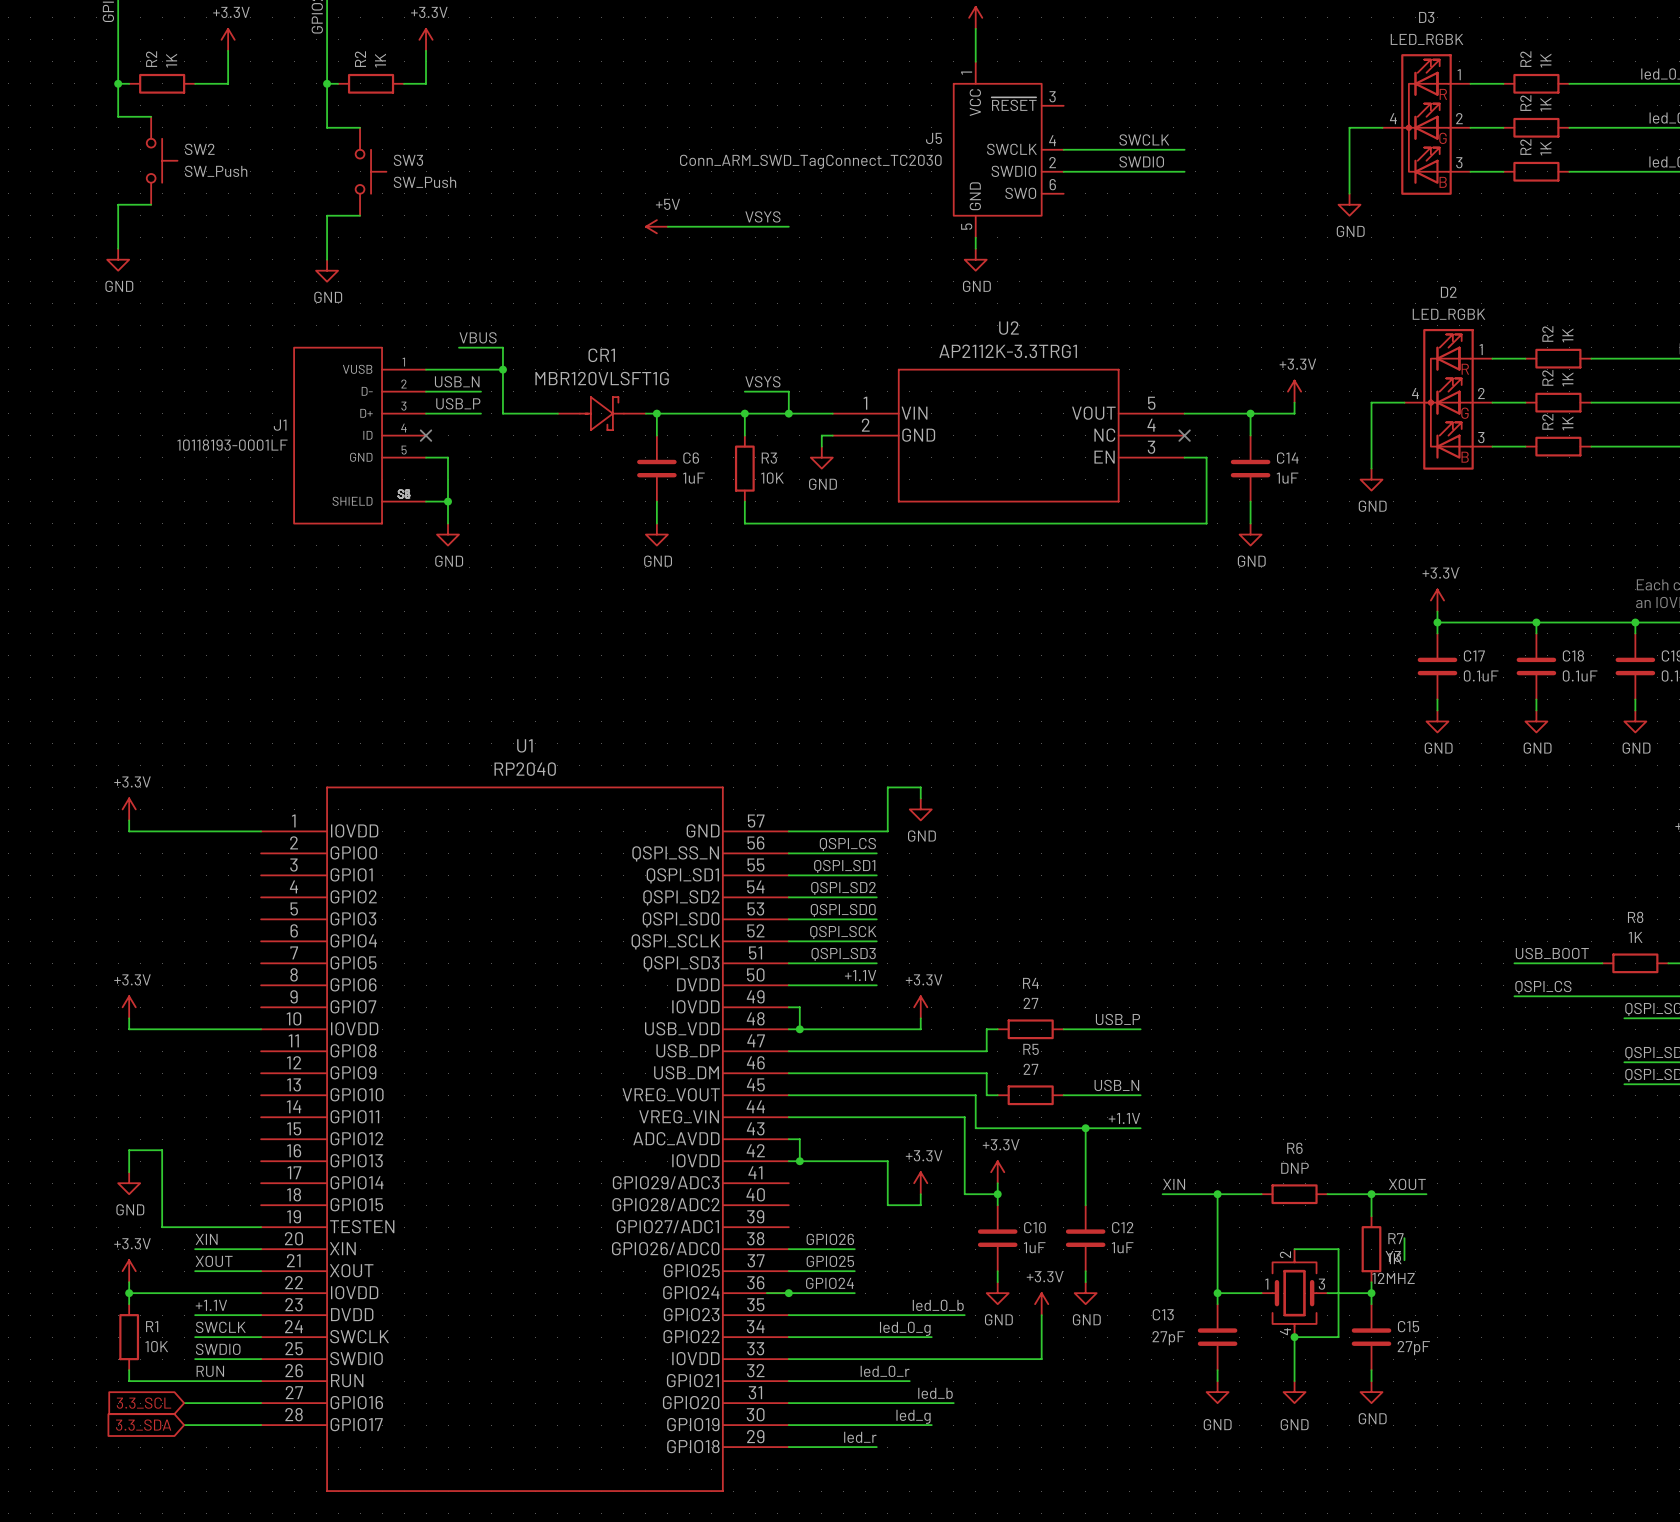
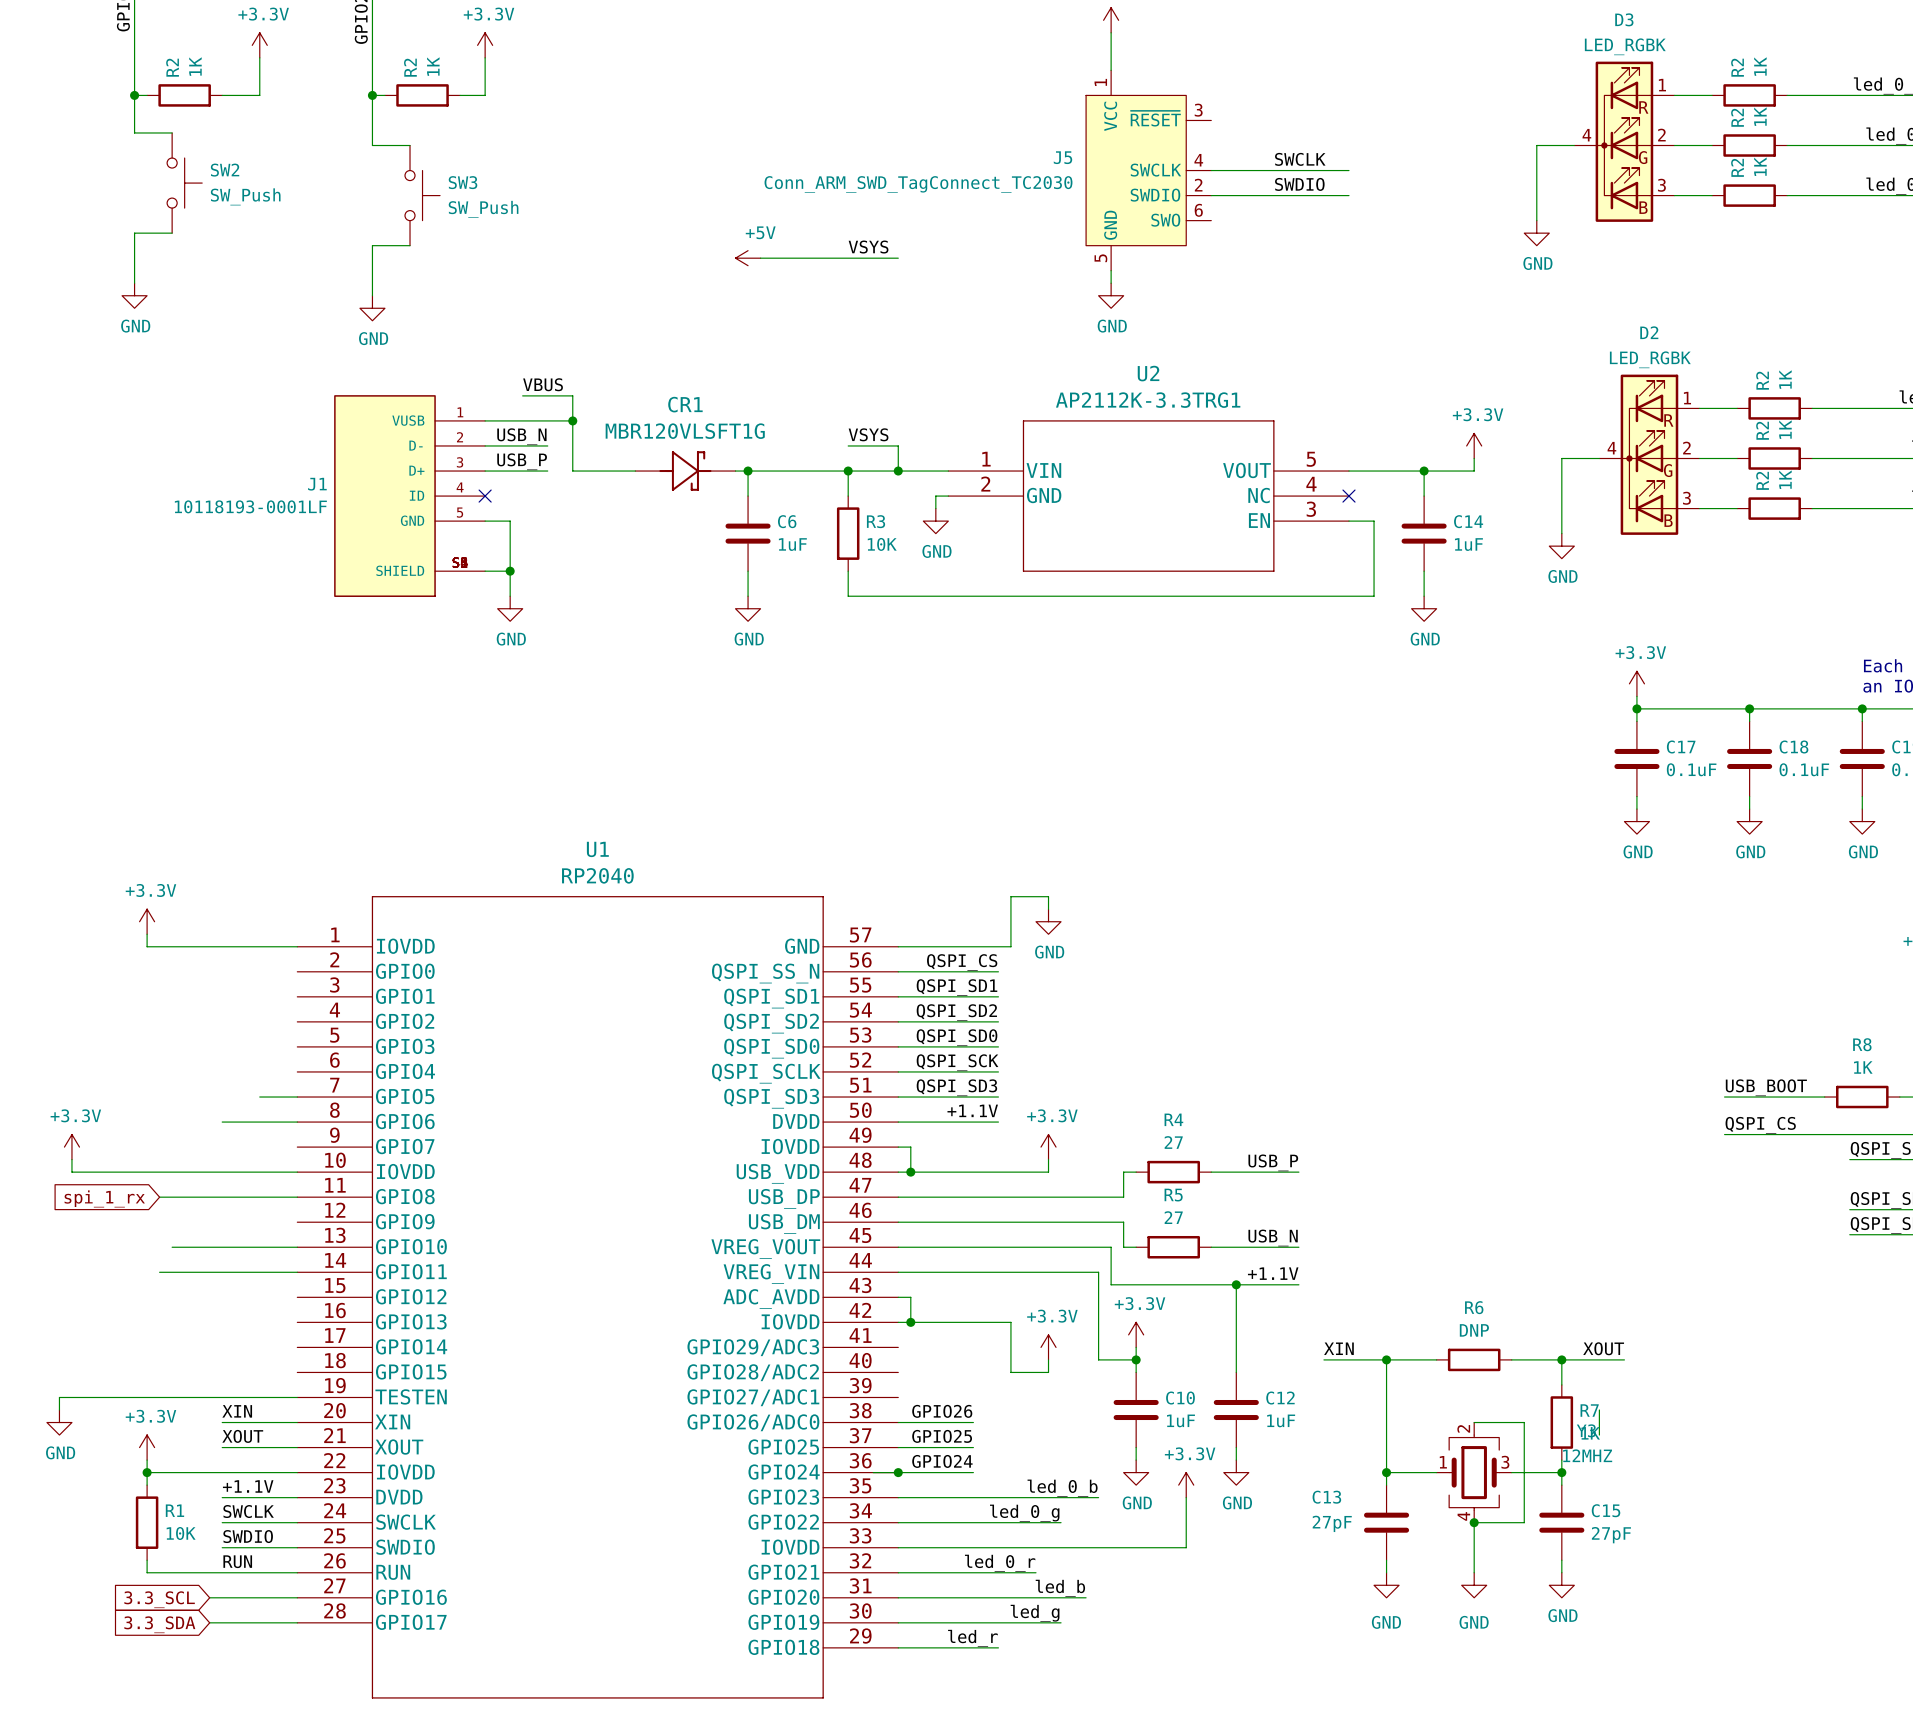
wire: none -> (259, 1097) (297, 1097)
wire: none -> (222, 1122) (297, 1122)
power symbol position: +3.3V (129, 1007) -> +3.3V (71, 1147)
wire: (129, 1018) (129, 1029) -> (71, 1159) (71, 1172) (147, 1172)
wire: none -> (159, 1197) (297, 1197)
global label: none -> spi_1_rx (104, 1198)
wire: none -> (172, 1247) (297, 1247)
wire: none -> (159, 1272) (297, 1272)
wire: (129, 1172) (129, 1150) (162, 1150) (162, 1227) -> (59, 1410) (59, 1397) (184, 1397)
power symbol position: GND (129, 1183) -> GND (59, 1422)

